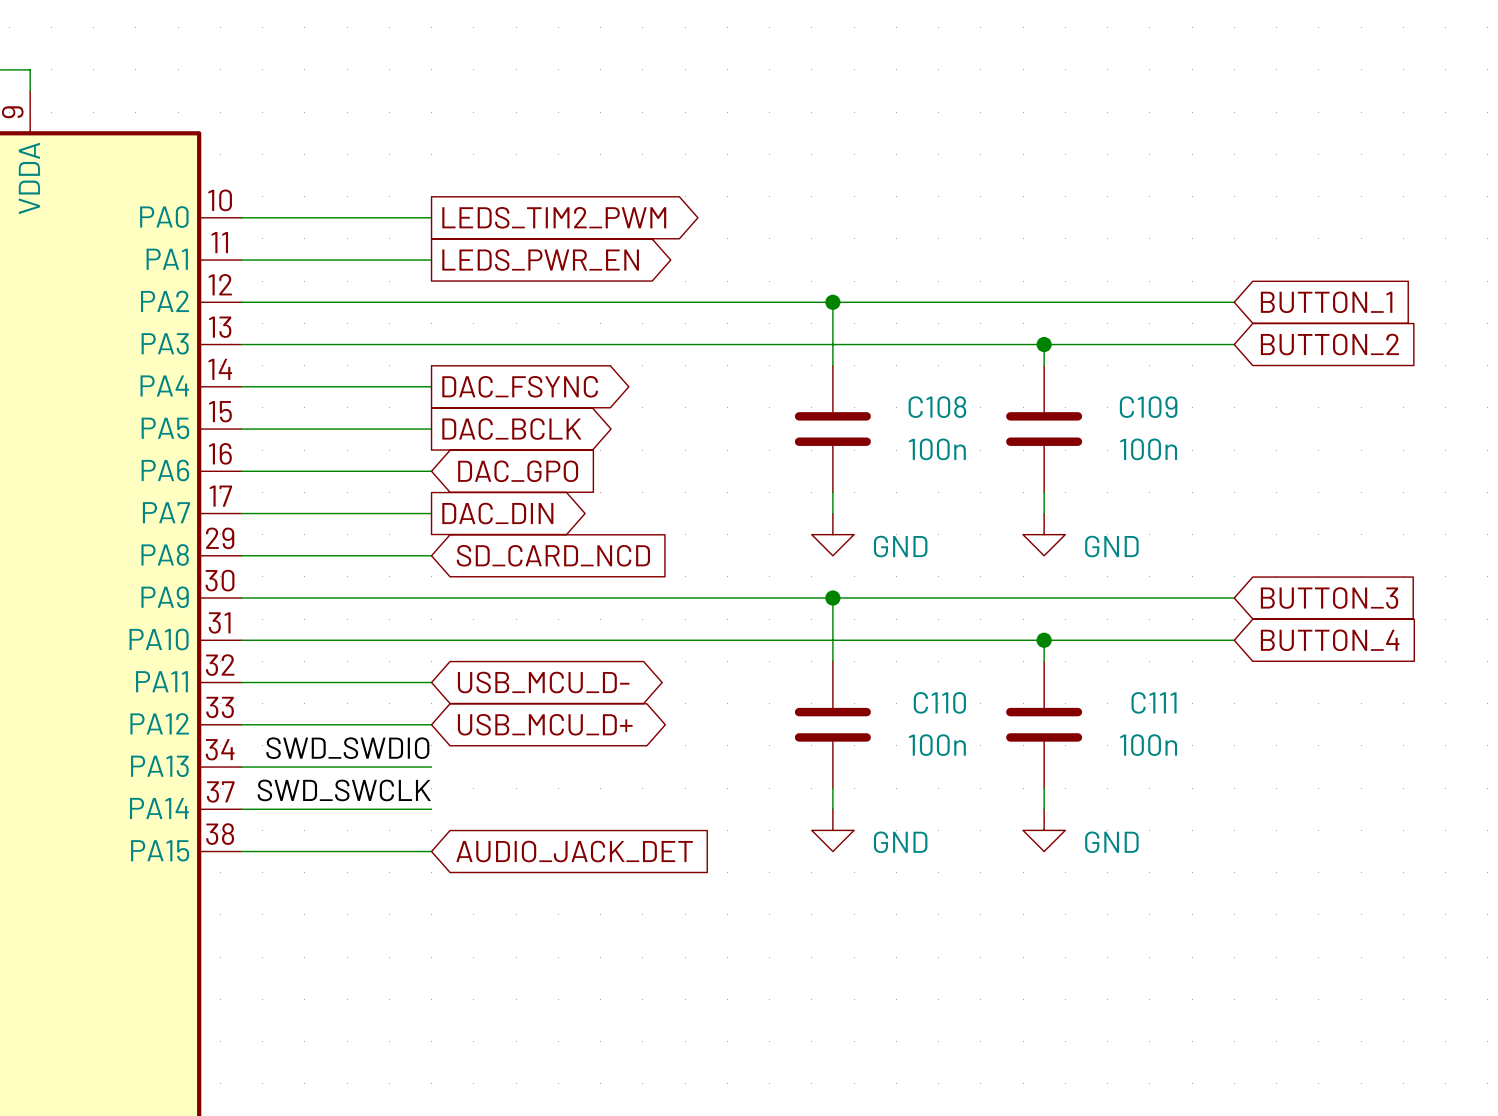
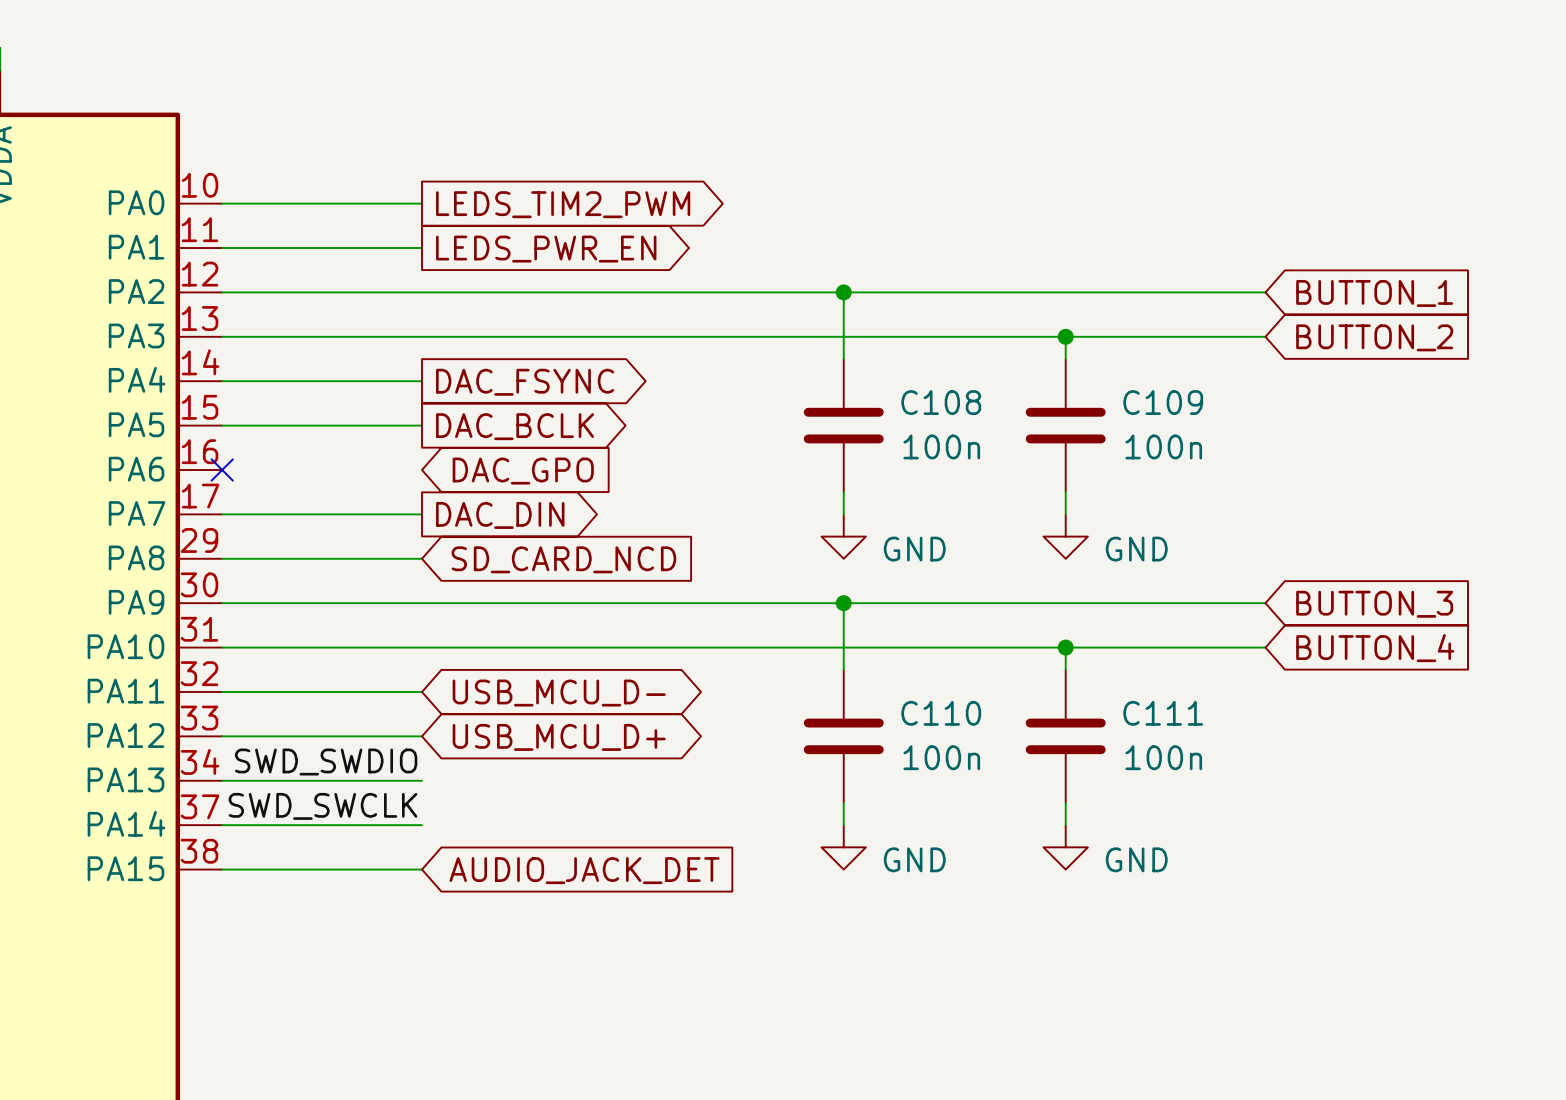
wire: (241, 471) (431, 471) -> none
no-connect mark: none -> (222, 469)

